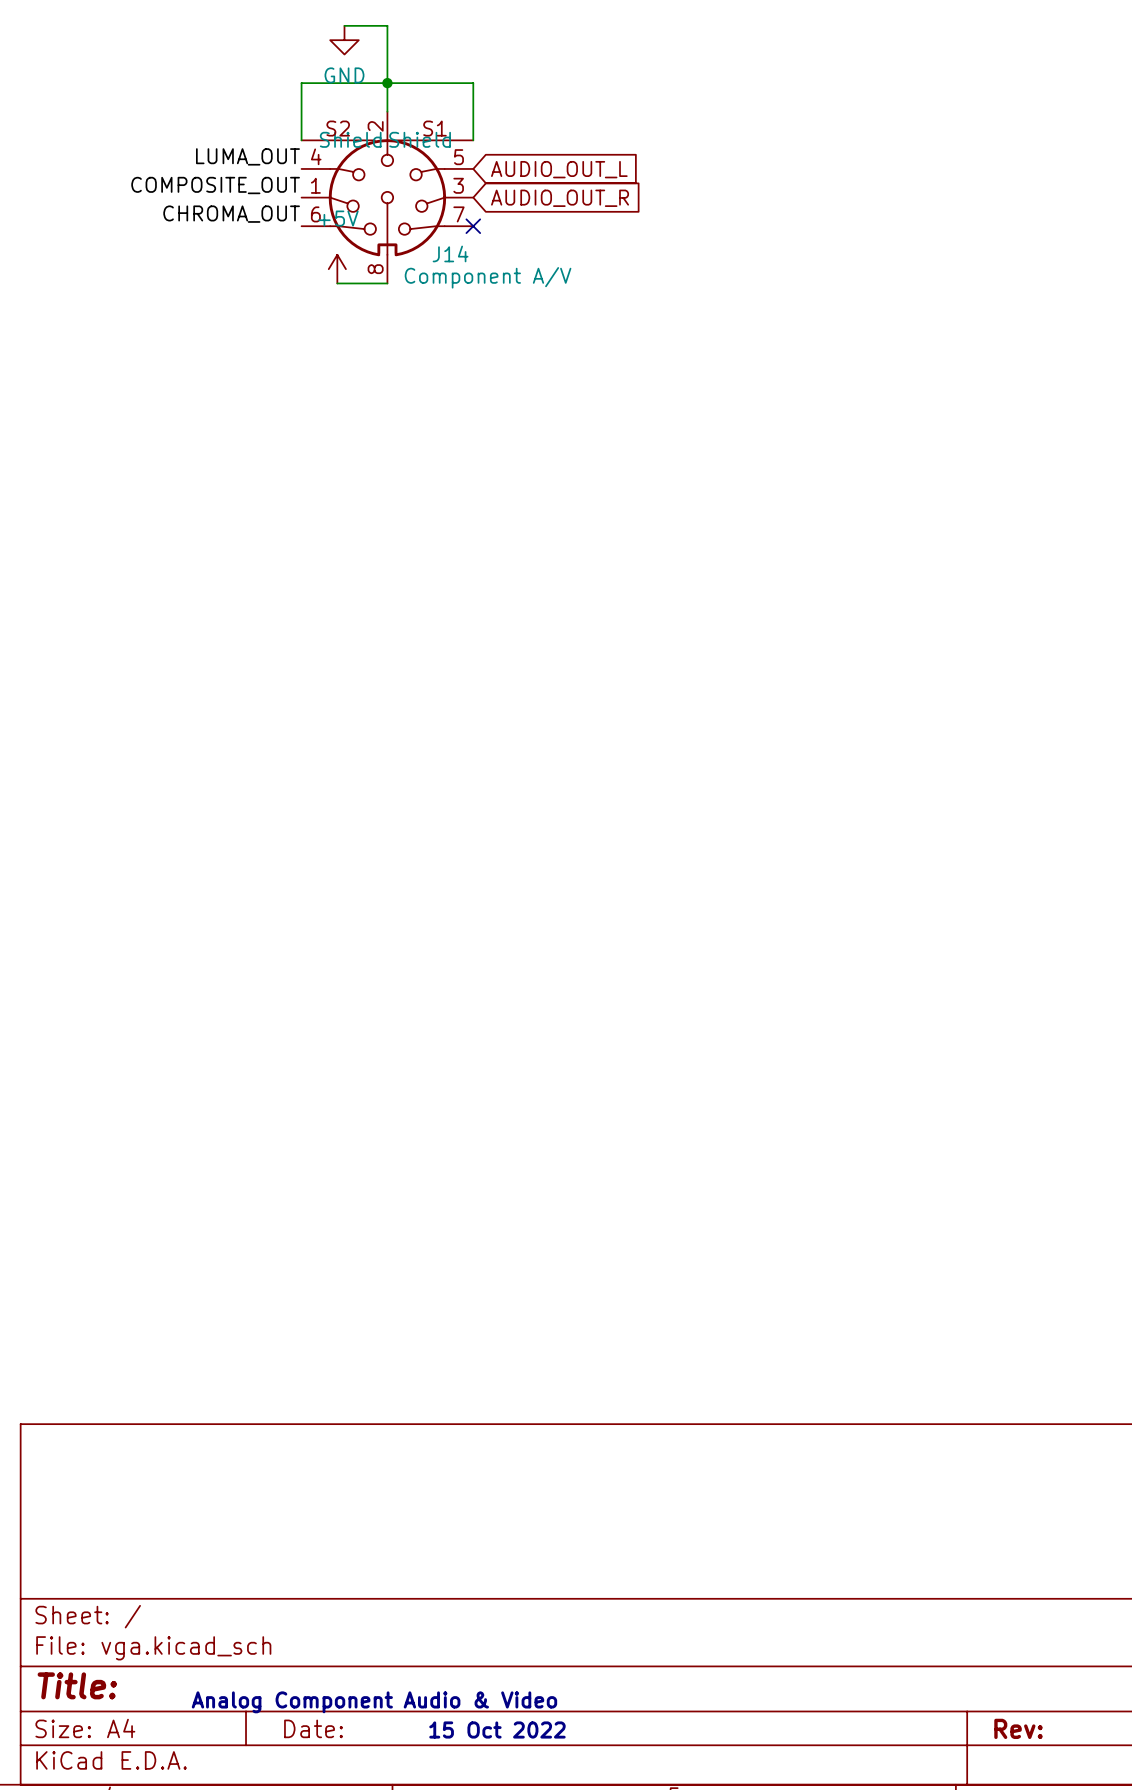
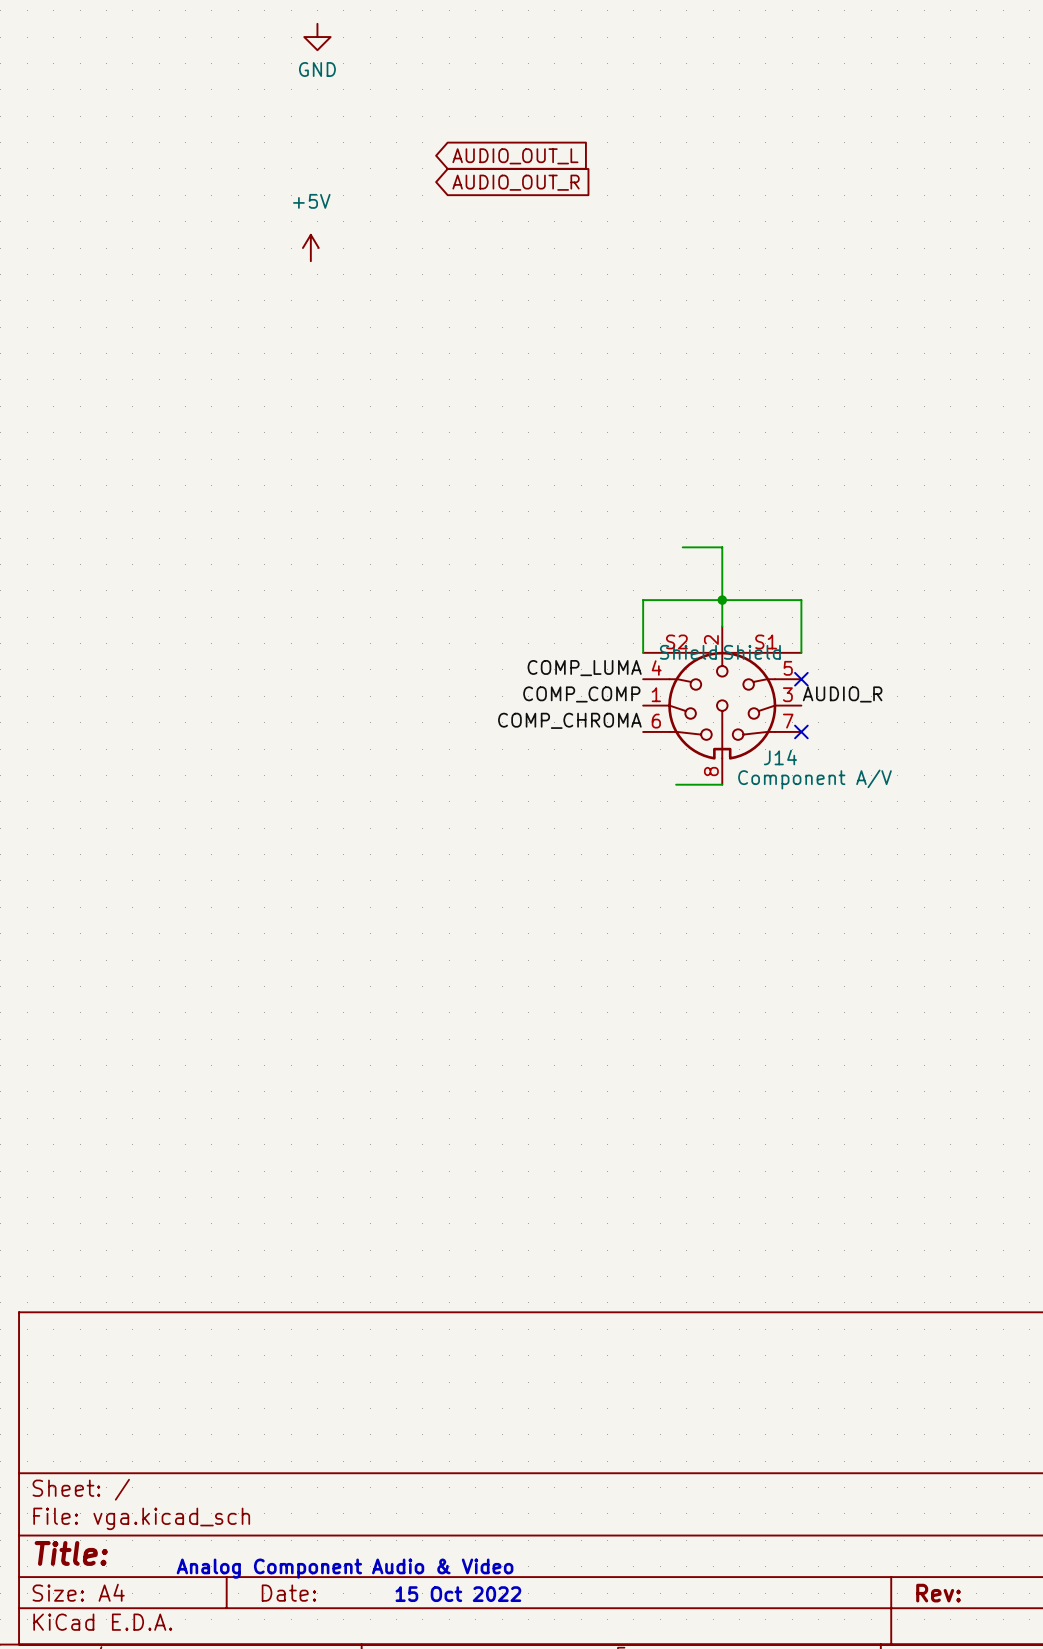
wire: (344, 25) (387, 25) (387, 111) -> none
junction: (387, 83) -> none
wire: (301, 140) (301, 83) (473, 83) (473, 140) -> none
label: LUMA_OUT (247, 156) -> none
label: COMPOSITE_OUT (215, 185) -> none
J14 position: (387, 197) -> (722, 705)
label: CHROMA_OUT (231, 214) -> none
no-connect mark: (473, 226) -> none
wire: (337, 283) (387, 283) -> none
wire: none -> (682, 547) (722, 547) (722, 626)
junction: none -> (722, 600)
wire: none -> (643, 652) (643, 600) (801, 600) (801, 652)
label: none -> COMP_LUMA (584, 668)
no-connect mark: none -> (801, 679)
label: none -> COMP_COMP (581, 694)
label: none -> AUDIO_R (842, 694)
label: none -> COMP_CHROMA (569, 720)
no-connect mark: none -> (801, 731)
wire: none -> (676, 784) (722, 784)

